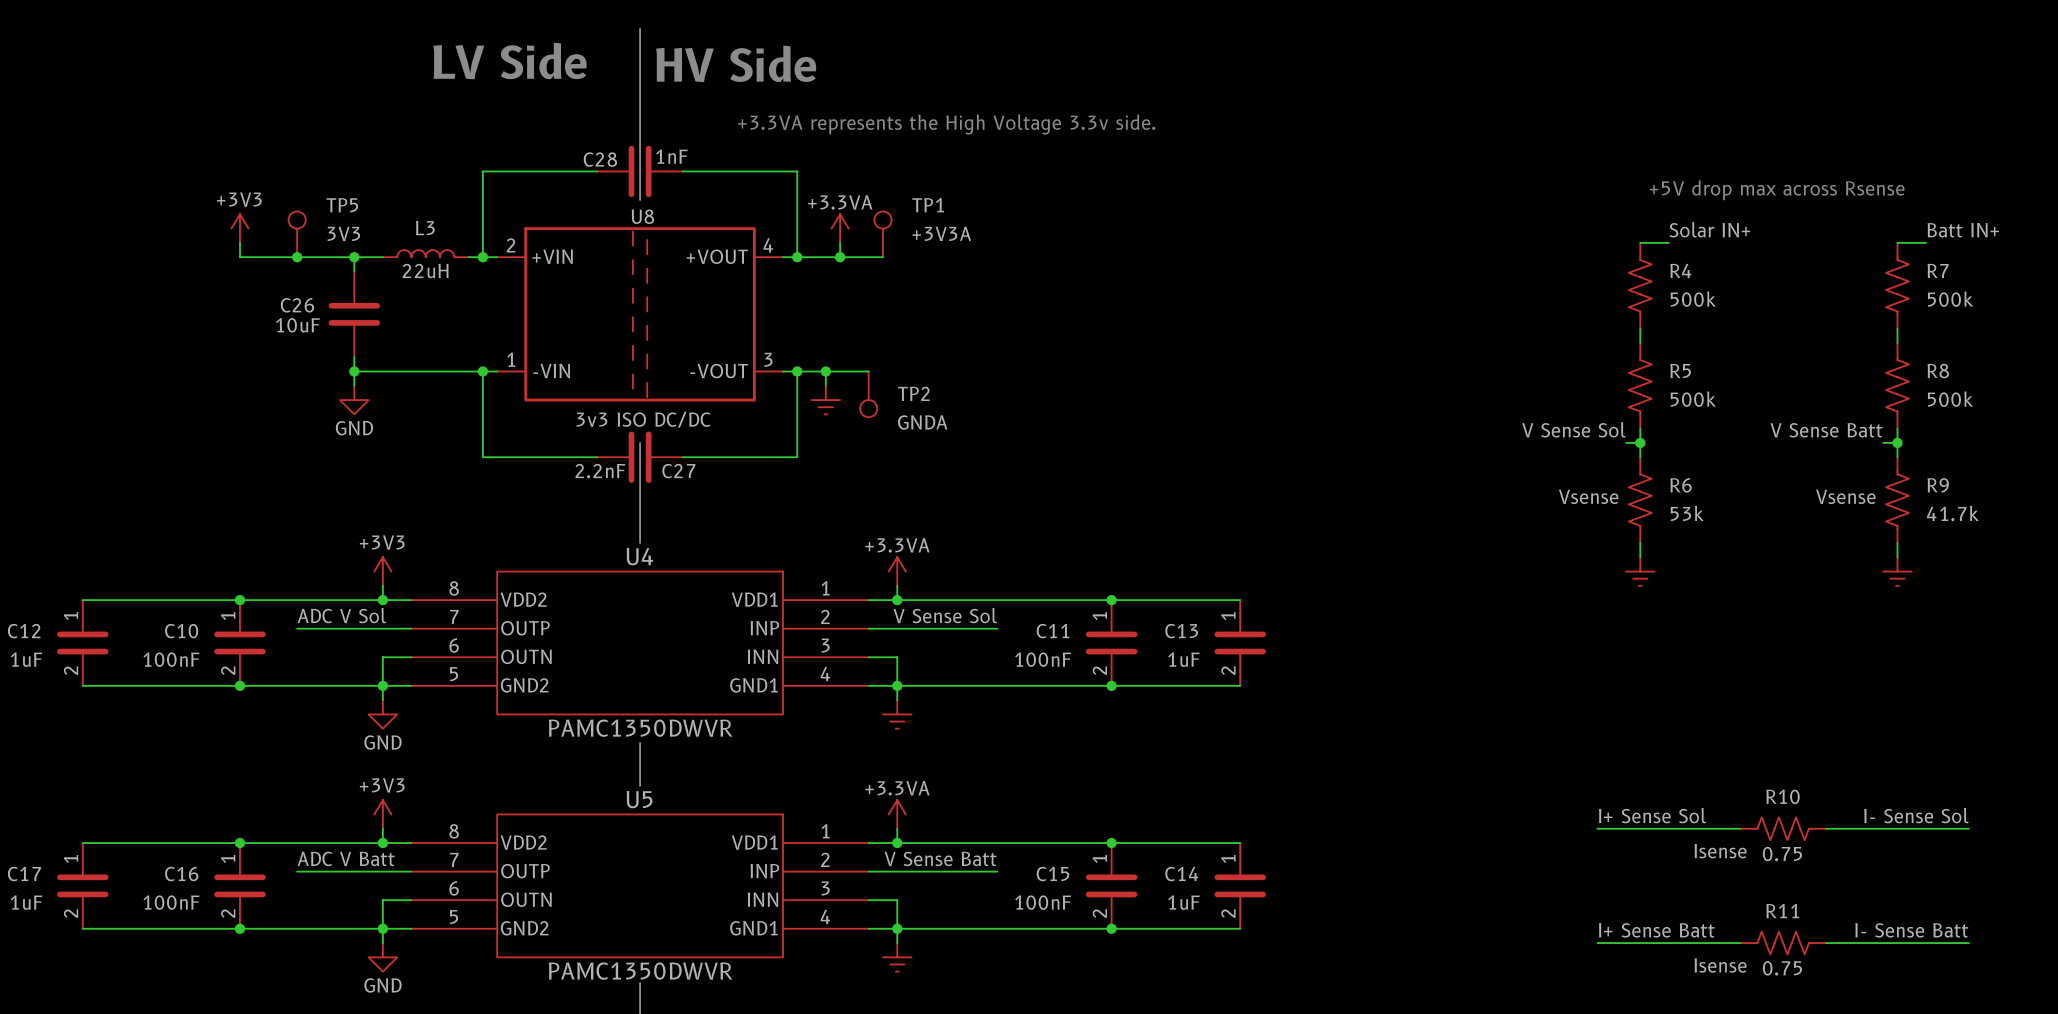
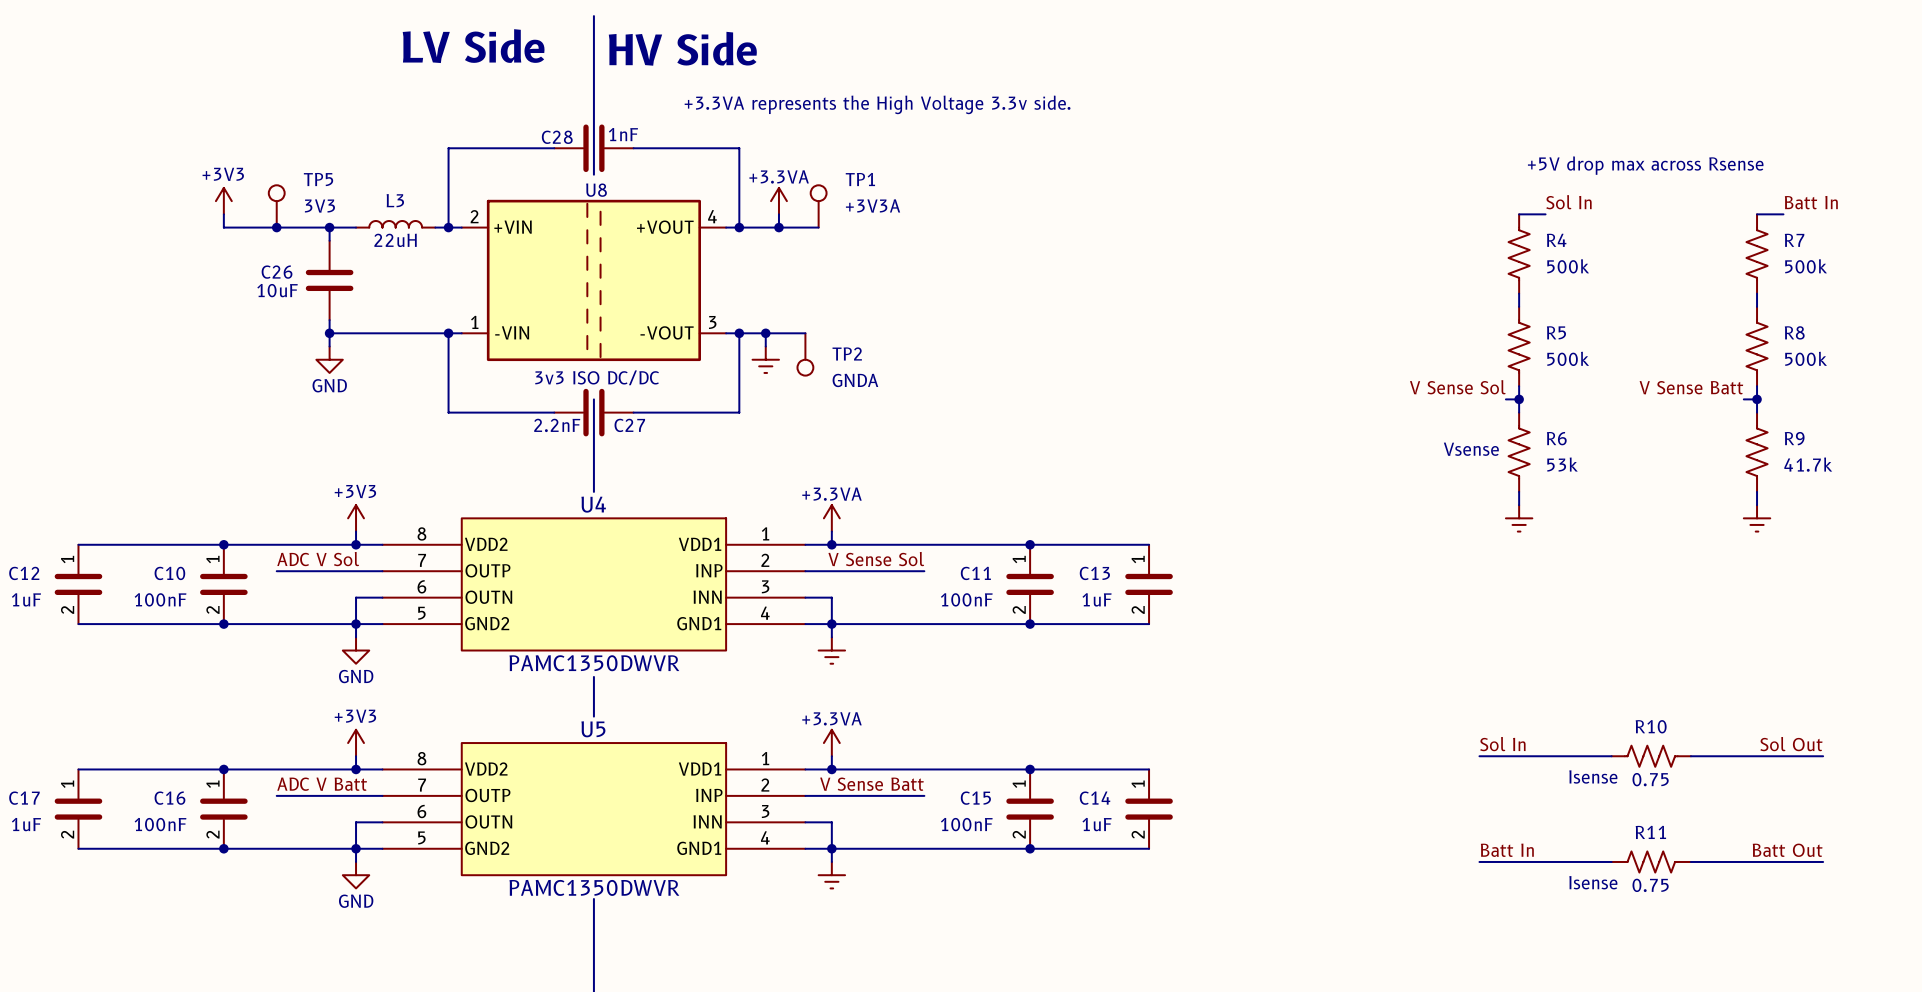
label: Solar IN+ (1709, 229) -> Sol In (1568, 202)
label: Batt IN+ (1963, 230) -> Batt In (1811, 202)
R9 text: Vsense (1845, 496) -> none
label: I+ Sense Sol (1652, 815) -> Sol In (1502, 744)
label: I- Sense Sol (1916, 815) -> Sol Out (1791, 744)
label: I+ Sense Batt (1656, 930) -> Batt In (1507, 850)
label: I- Sense Batt (1911, 930) -> Batt Out (1787, 850)

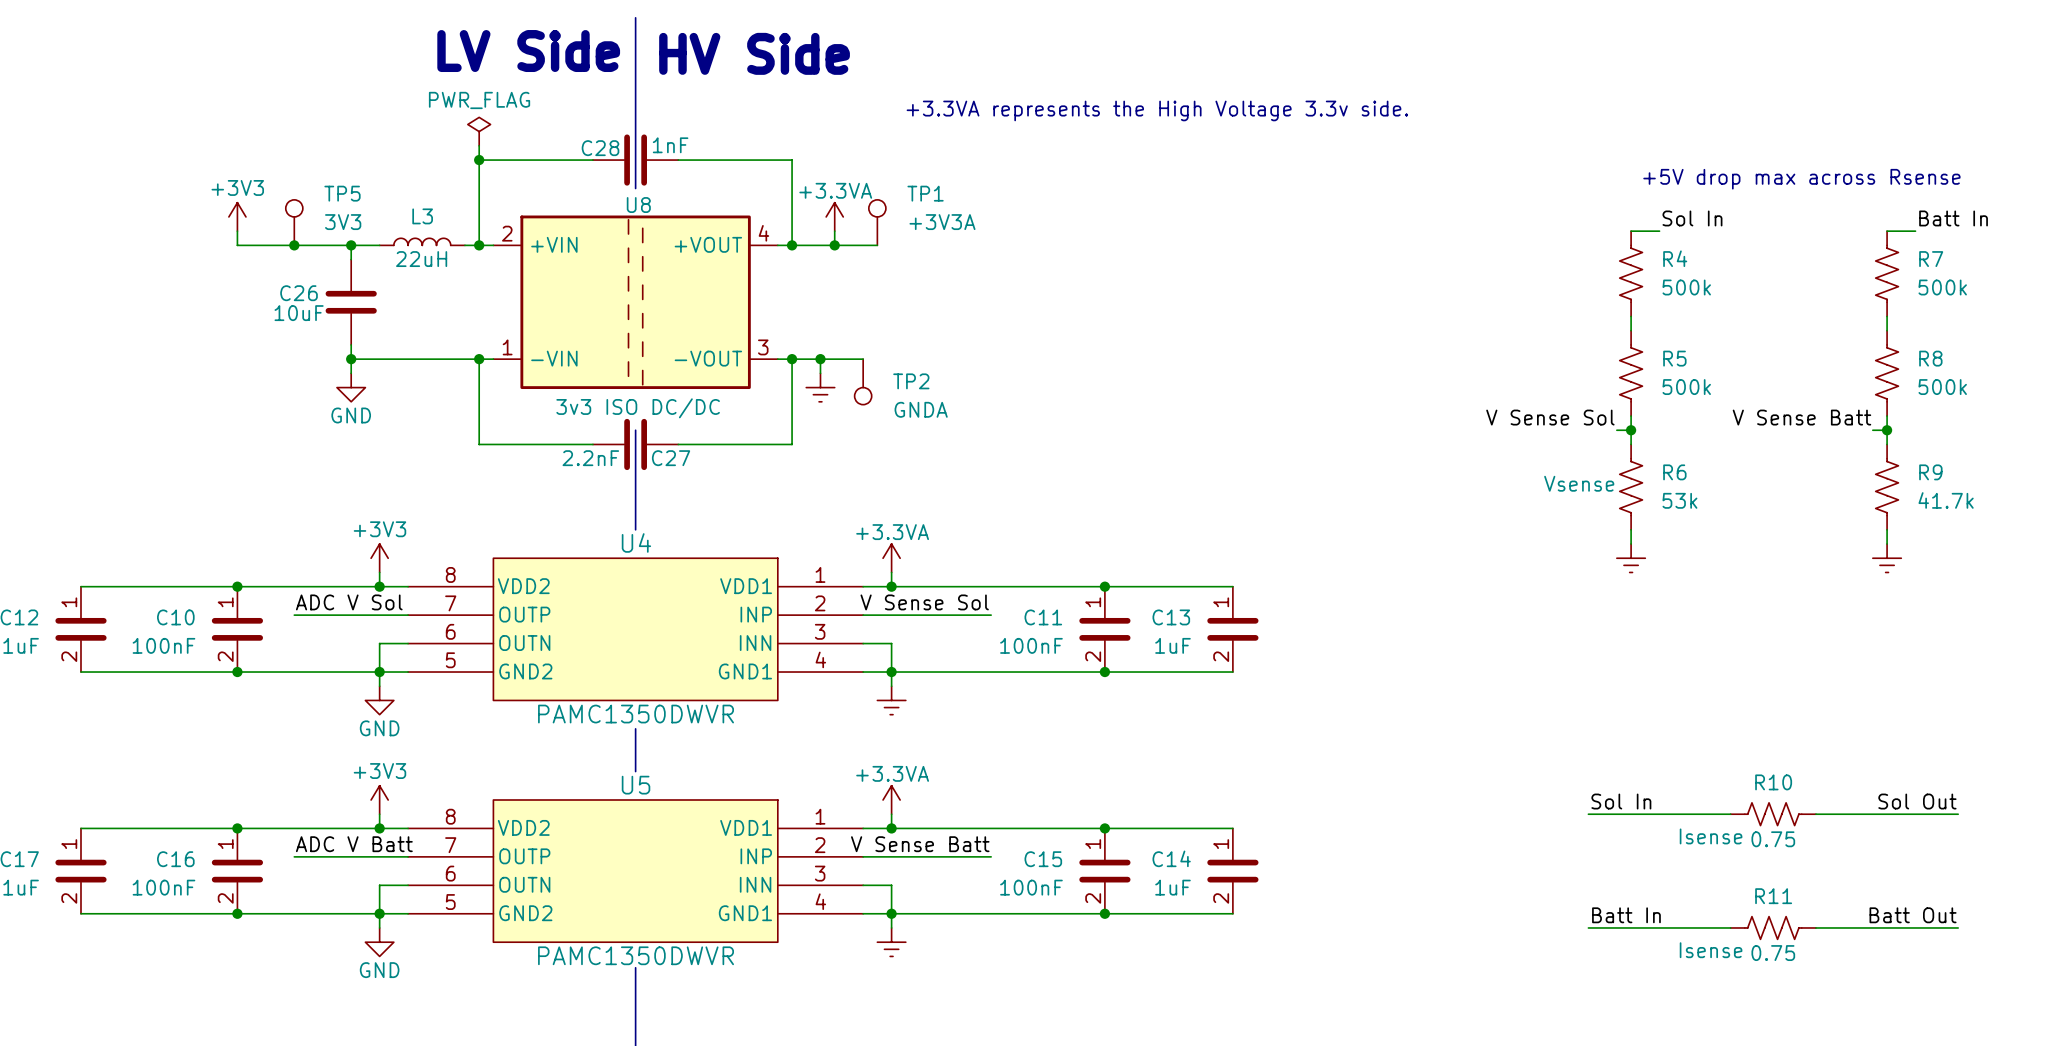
text position: +3.3VA represents the High Voltage 3.3v side. (877, 104) -> +3.3VA represents the High Voltage 3.3v side. (1157, 110)
power symbol: none -> PWR_FLAG (479, 131)
wire: none -> (479, 145) (479, 160)
junction: none -> (479, 160)

